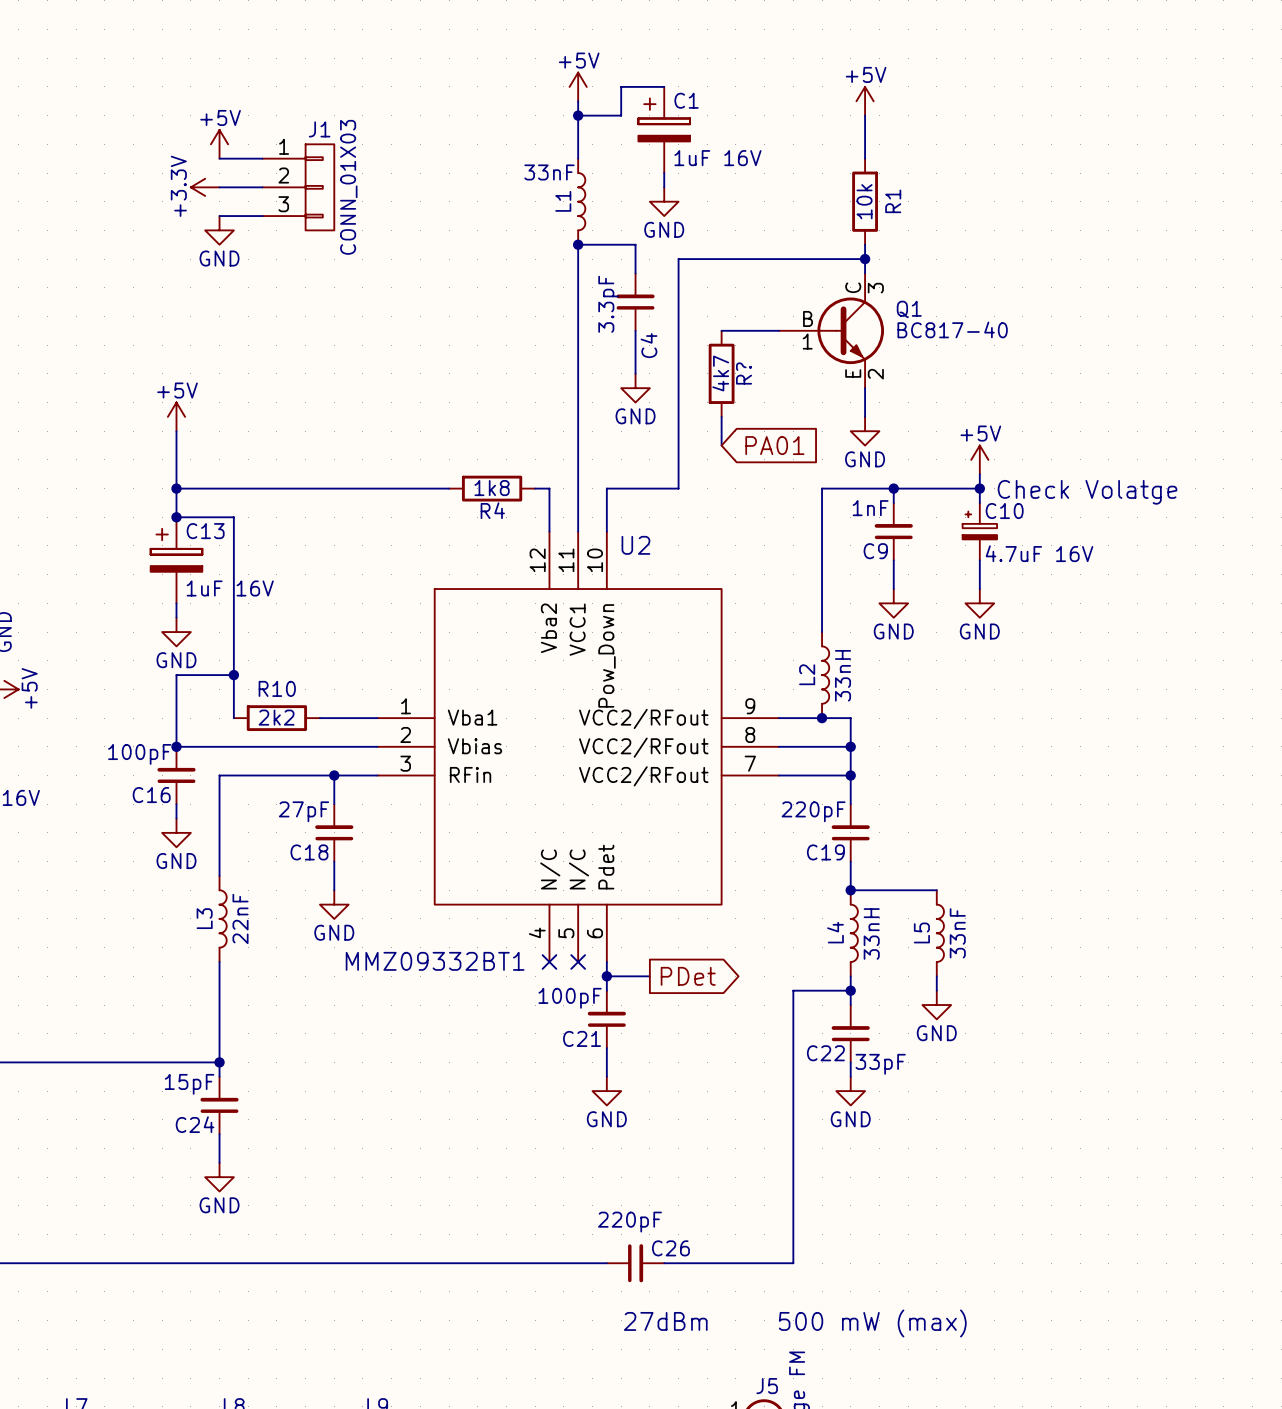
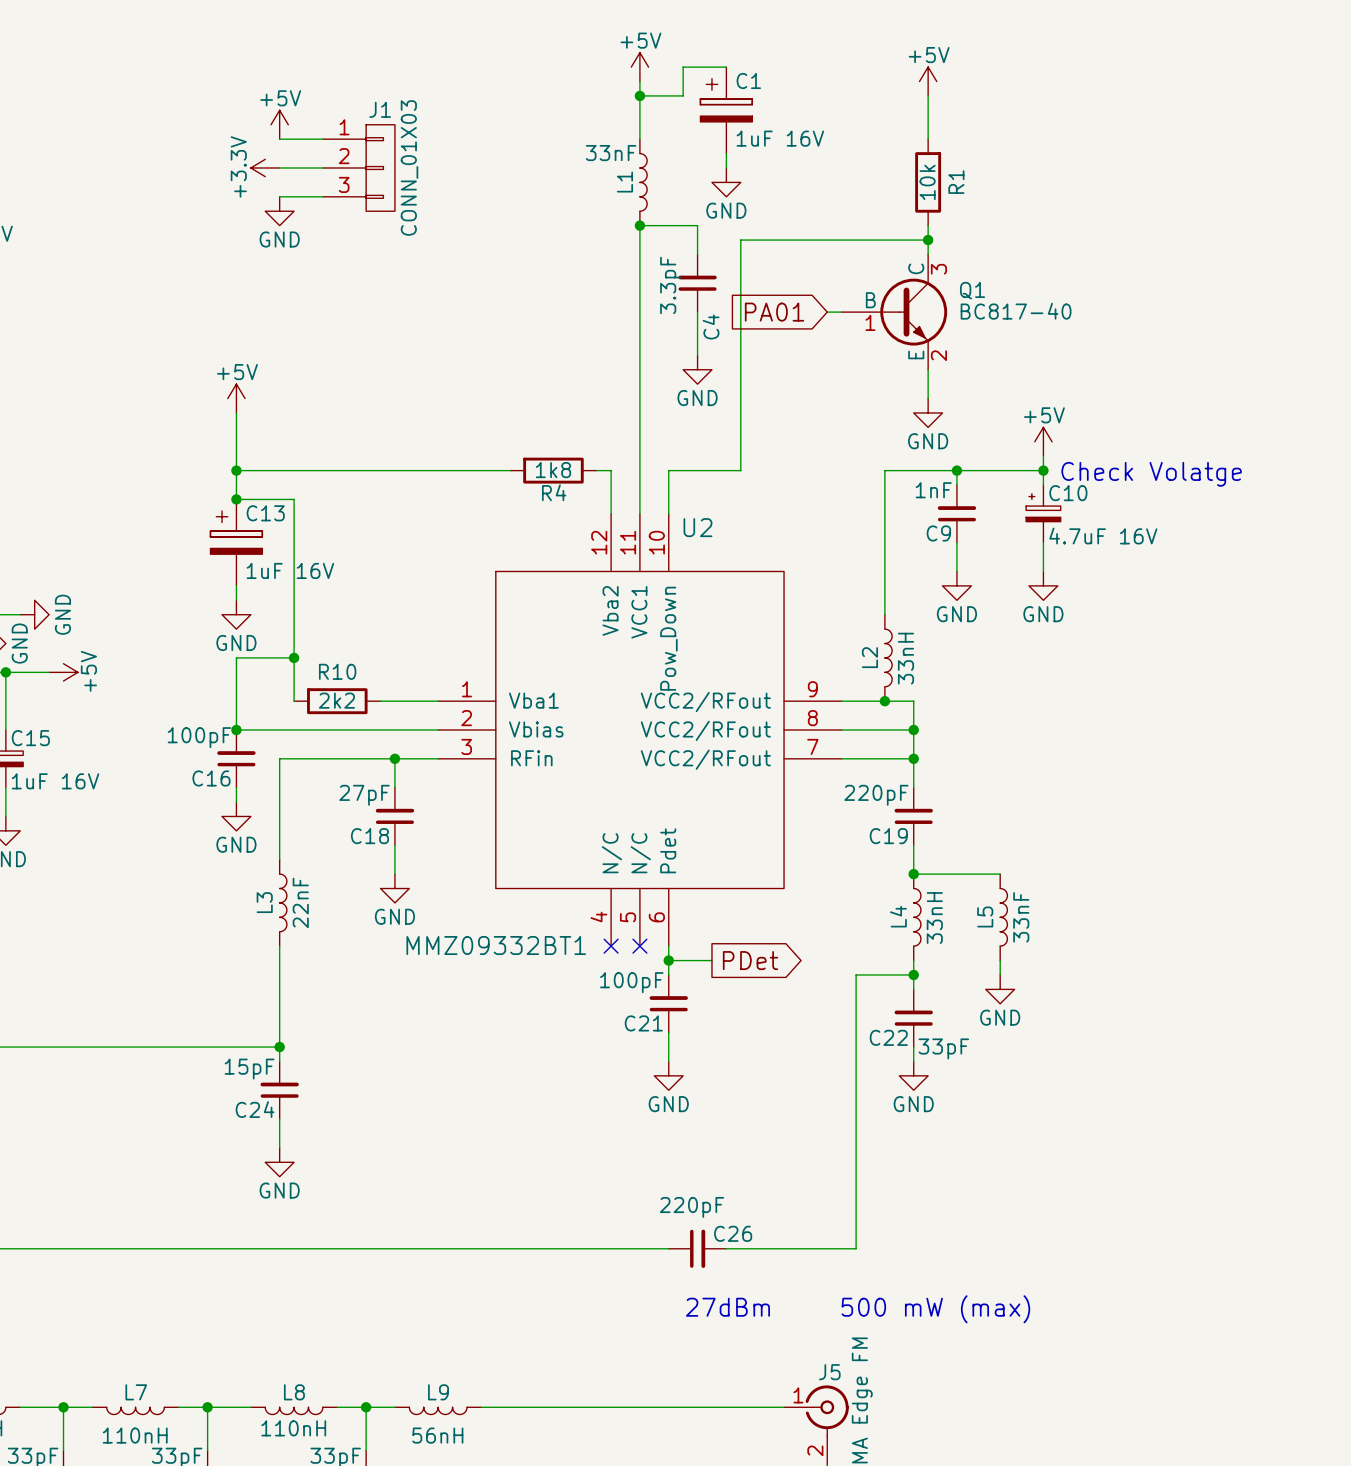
wire: (721, 330) (764, 330) -> none
R?: 4k7 (721, 373) -> none
wire: (721, 416) (721, 445) -> none
global label rotation: 0° (774, 445) -> 180° (774, 312)
global label position: PA01 (774, 445) -> PA01 (774, 312)

